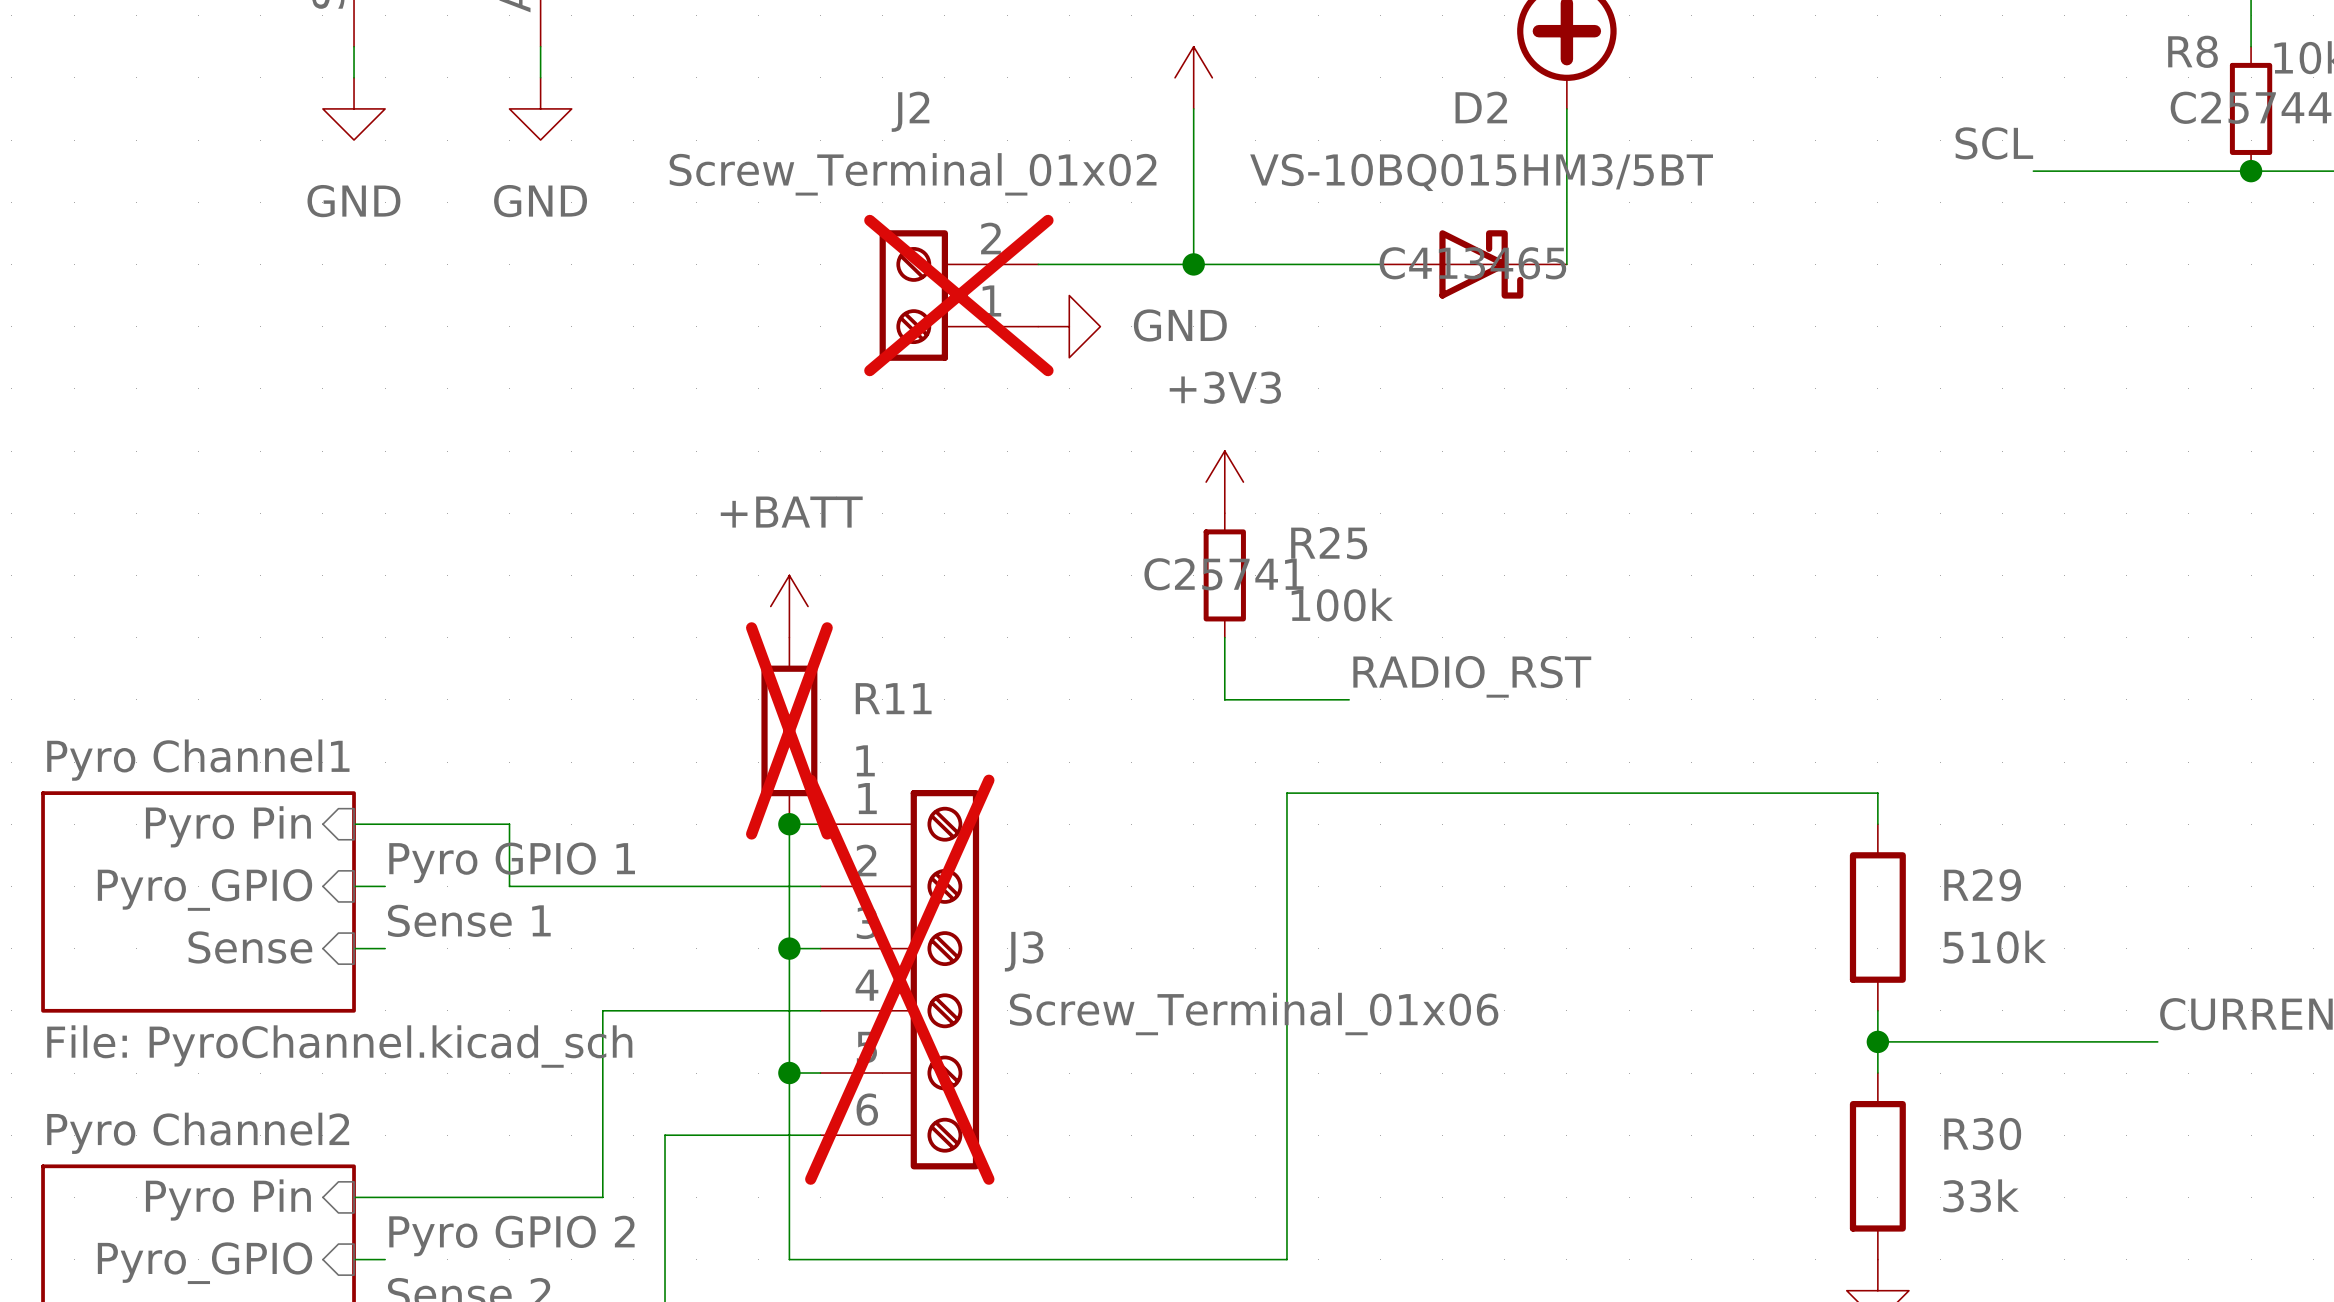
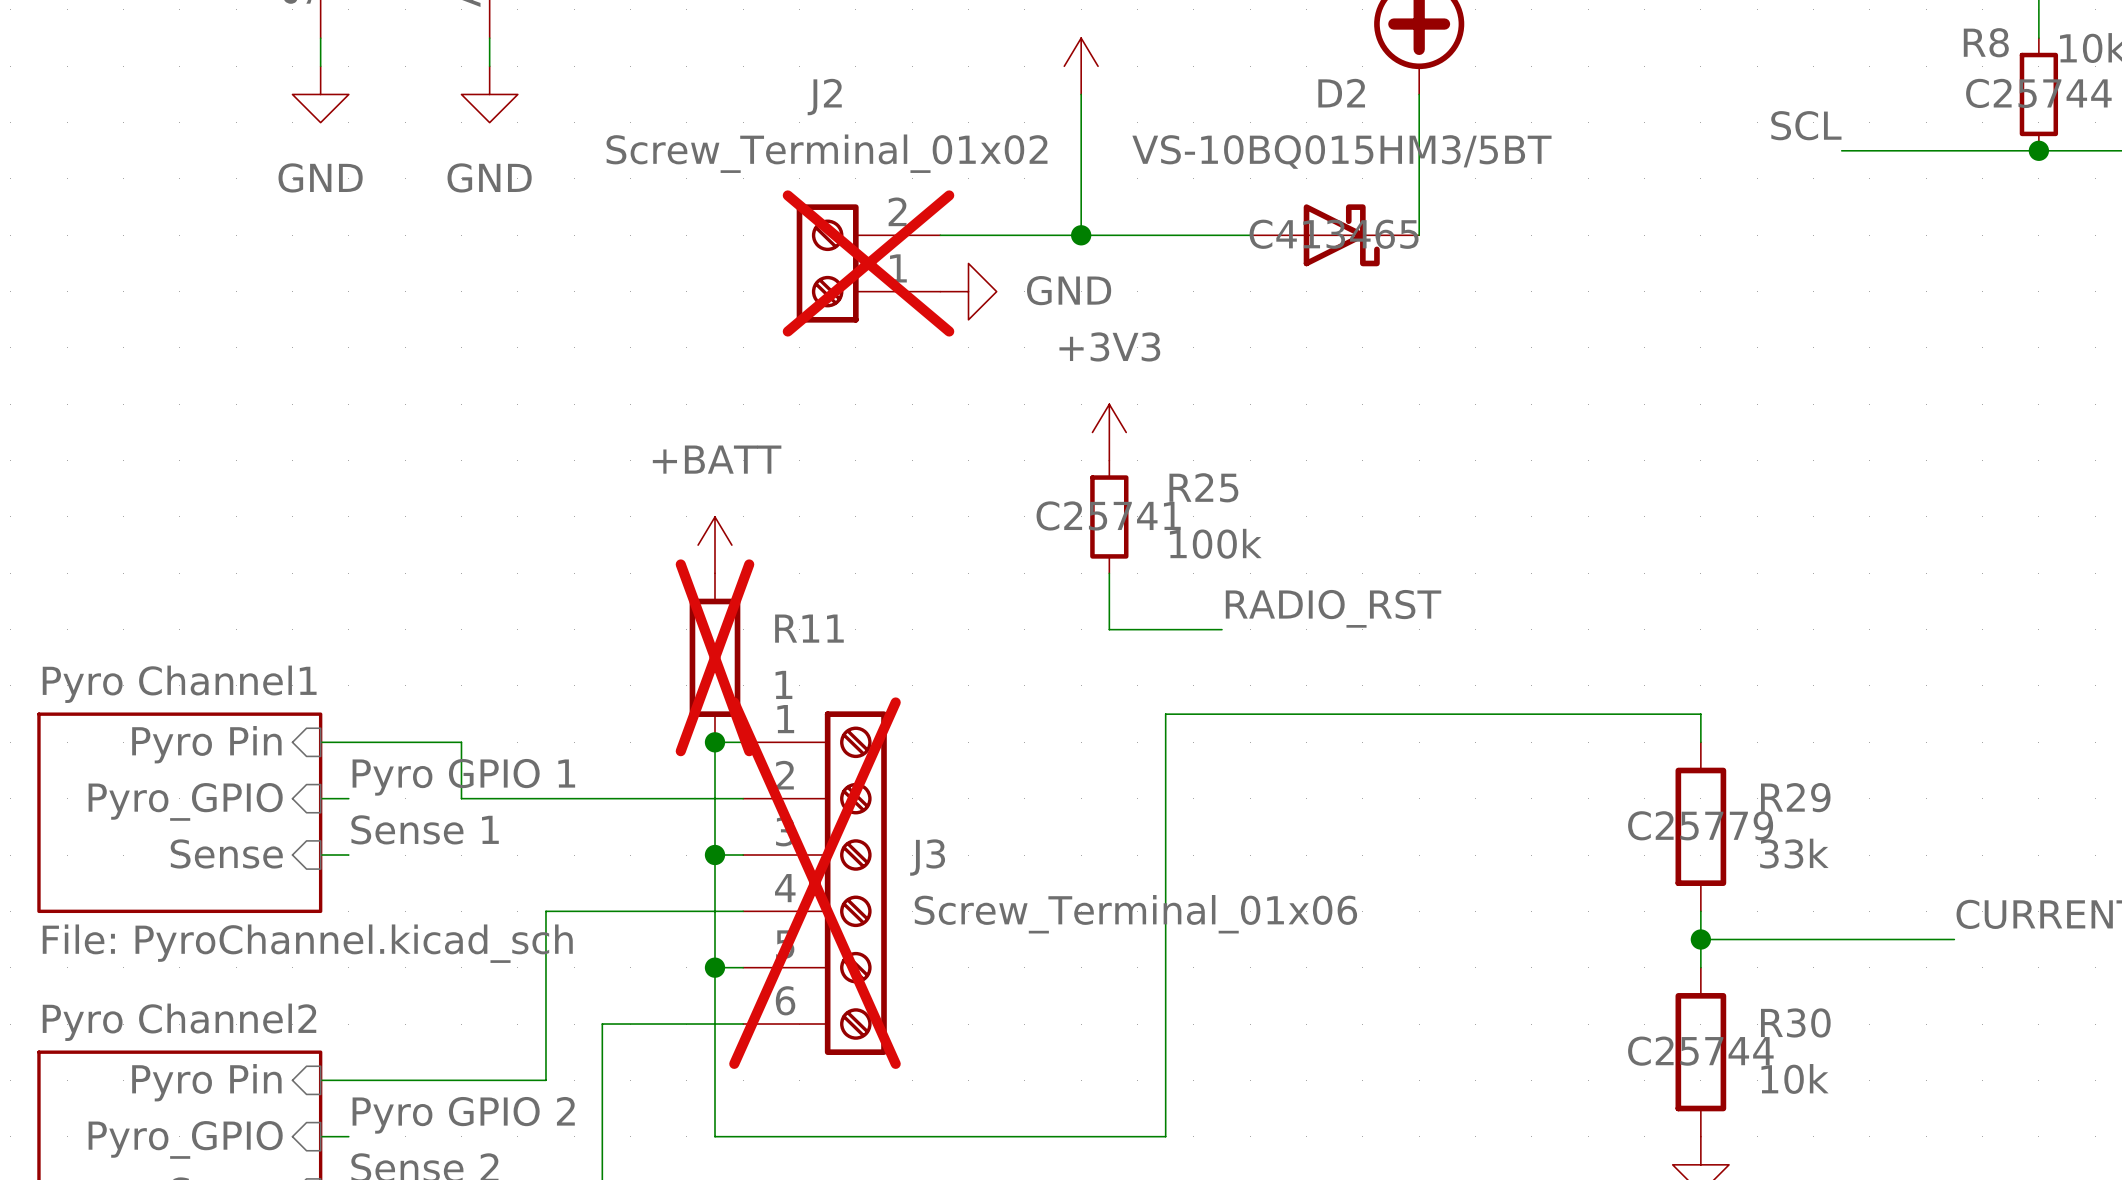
R29 text: none -> C25779 (1700, 825)
R29 value: 510k (1994, 947) -> 33k (1794, 853)
R30 text: none -> C25744 (1700, 1051)
R30 value: 33k (1981, 1195) -> 10k (1795, 1078)

